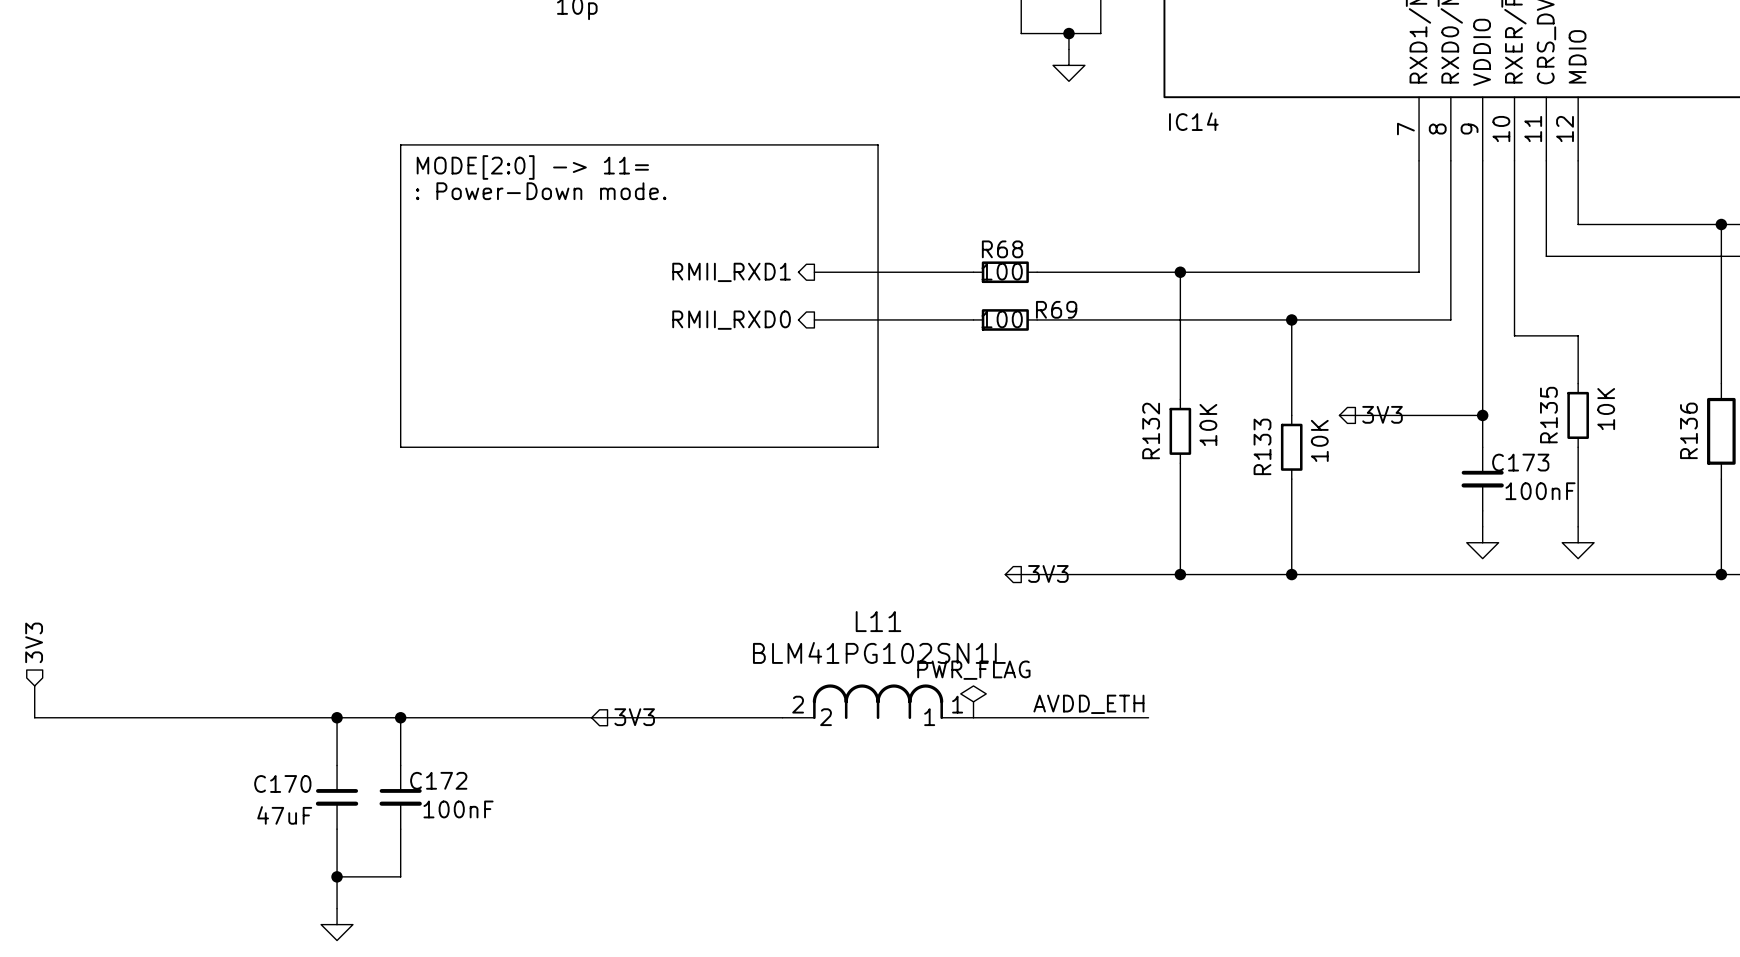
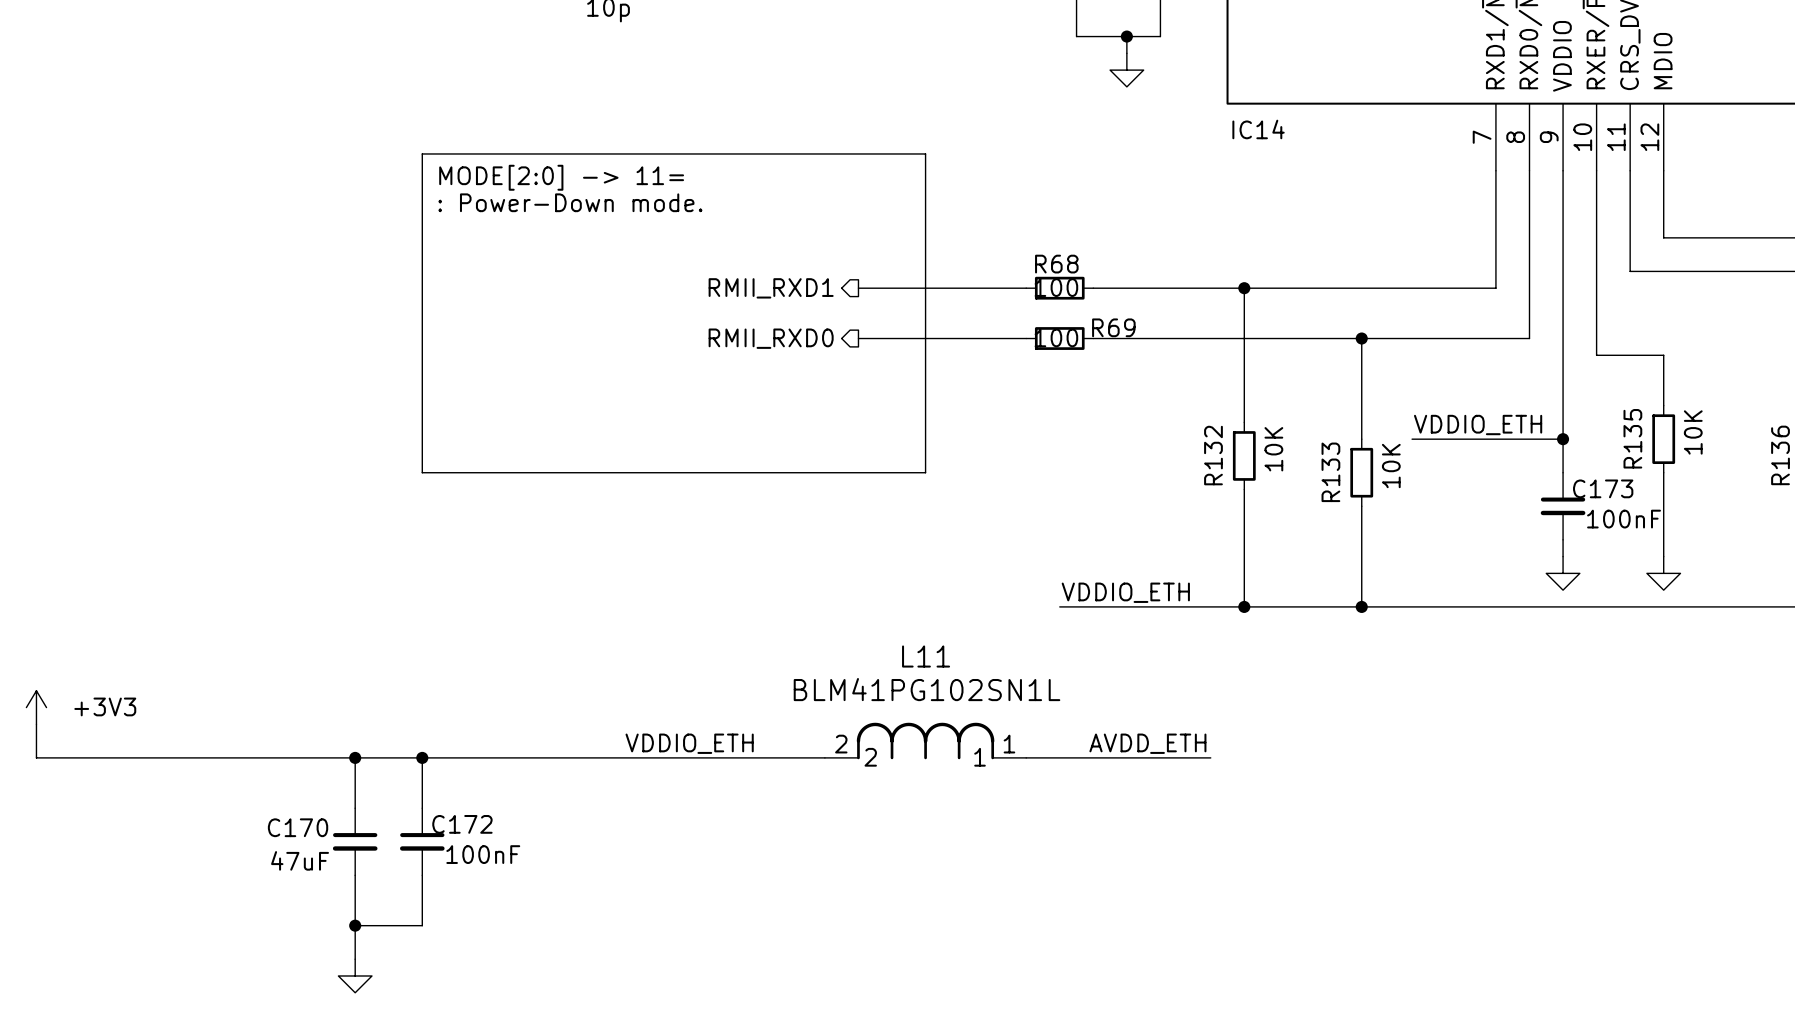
label: none -> VDDIO_ETH (1478, 425)
hierarchical label: 3V3 (1382, 414) -> none
label: none -> VDDIO_ETH (1125, 592)
hierarchical label: 3V3 (1048, 573) -> none
hierarchical label: 3V3 (34, 642) -> none
power symbol: none -> +3V3 (36, 707)
power symbol: PWR_FLAG (973, 701) -> none
label: none -> VDDIO_ETH (689, 743)
hierarchical label: 3V3 (634, 717) -> none

